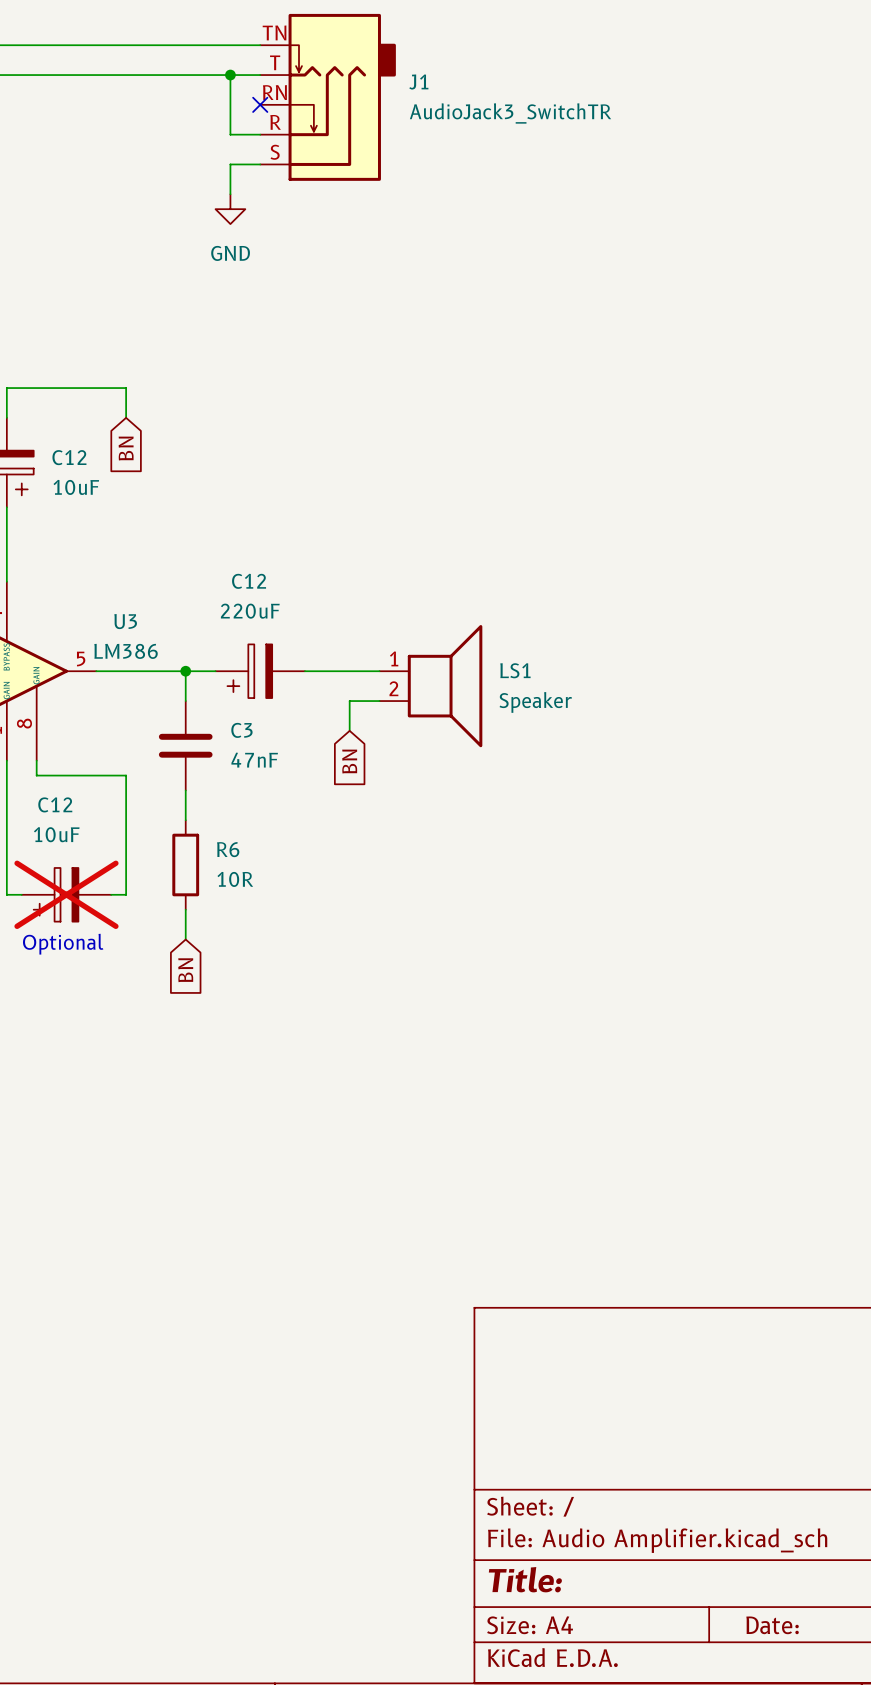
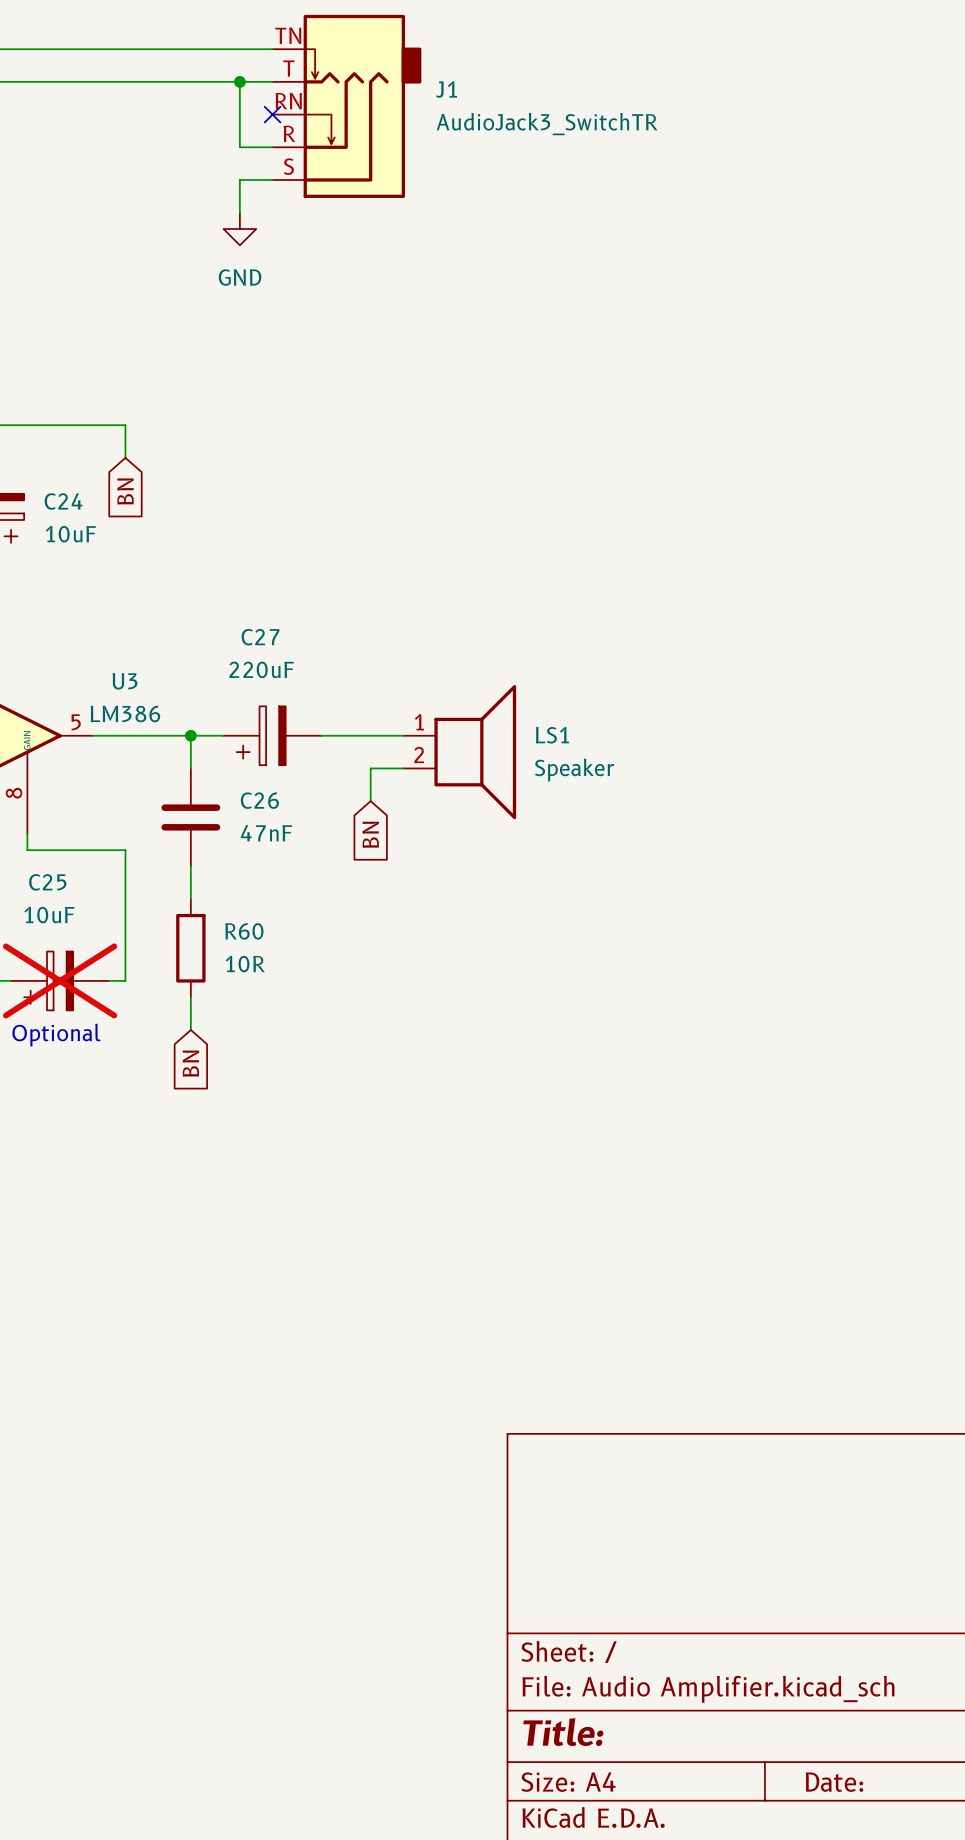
C12 name: C12 (69, 457) -> C24 (63, 501)
C12 name: C12 (249, 581) -> C27 (260, 637)
C3 name: C3 (241, 730) -> C26 (259, 800)
C12 name: C12 (55, 804) -> C25 (47, 882)
R6 name: R6 (228, 849) -> R60 (244, 931)

